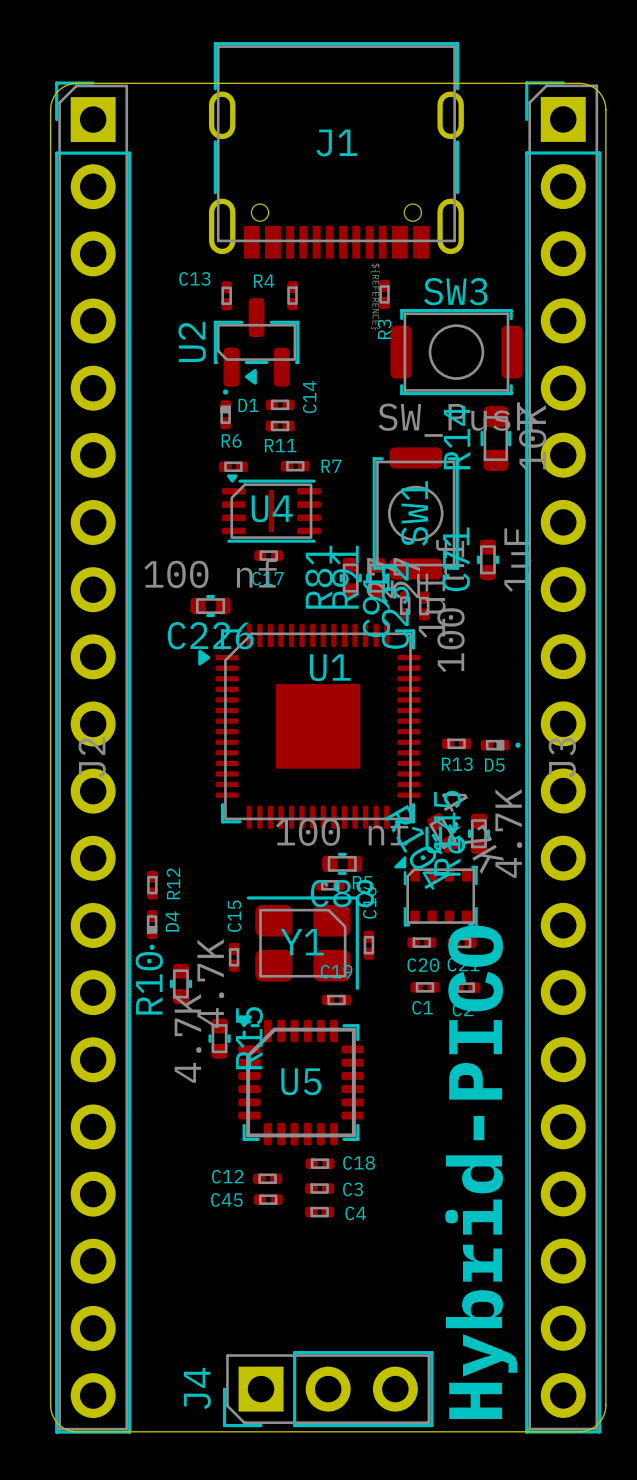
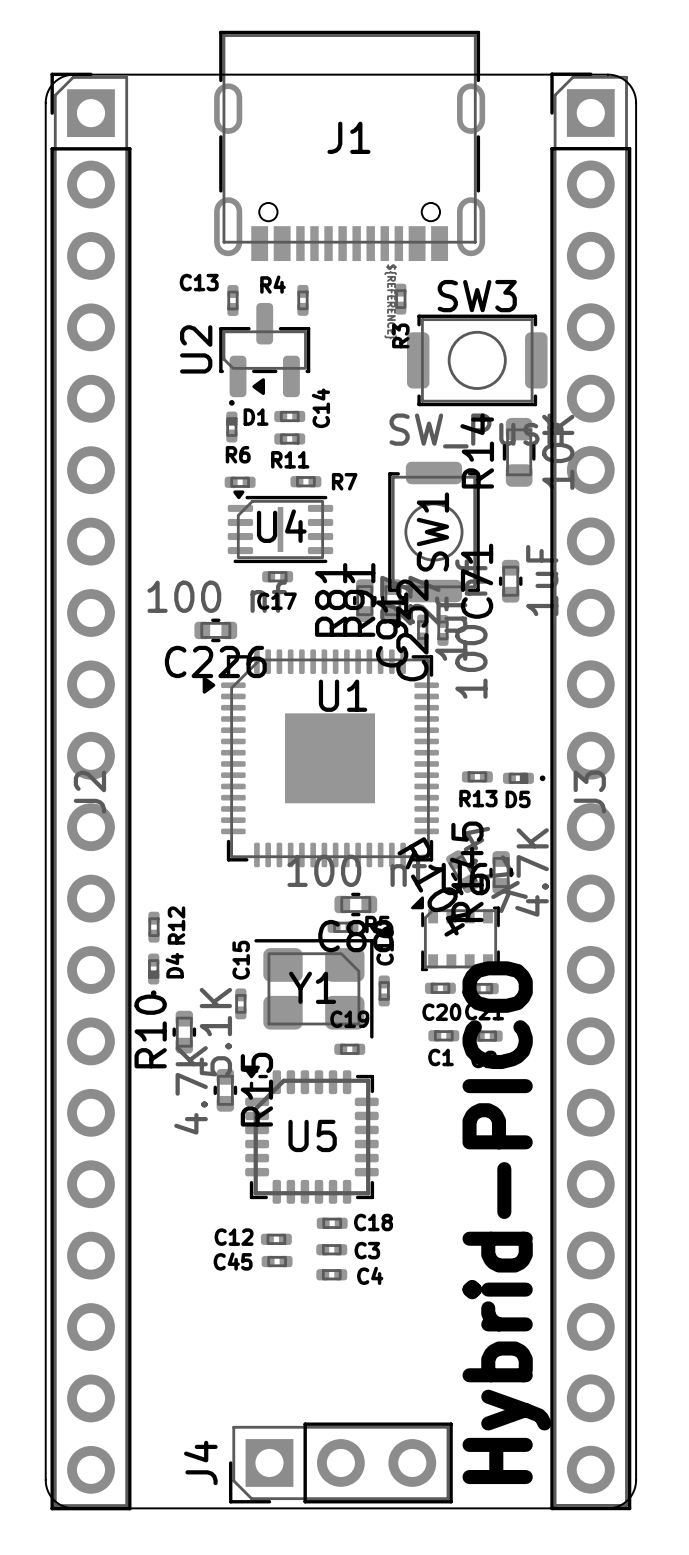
R10 value: 4.7K (210, 983) -> 5.1K (215, 1032)

